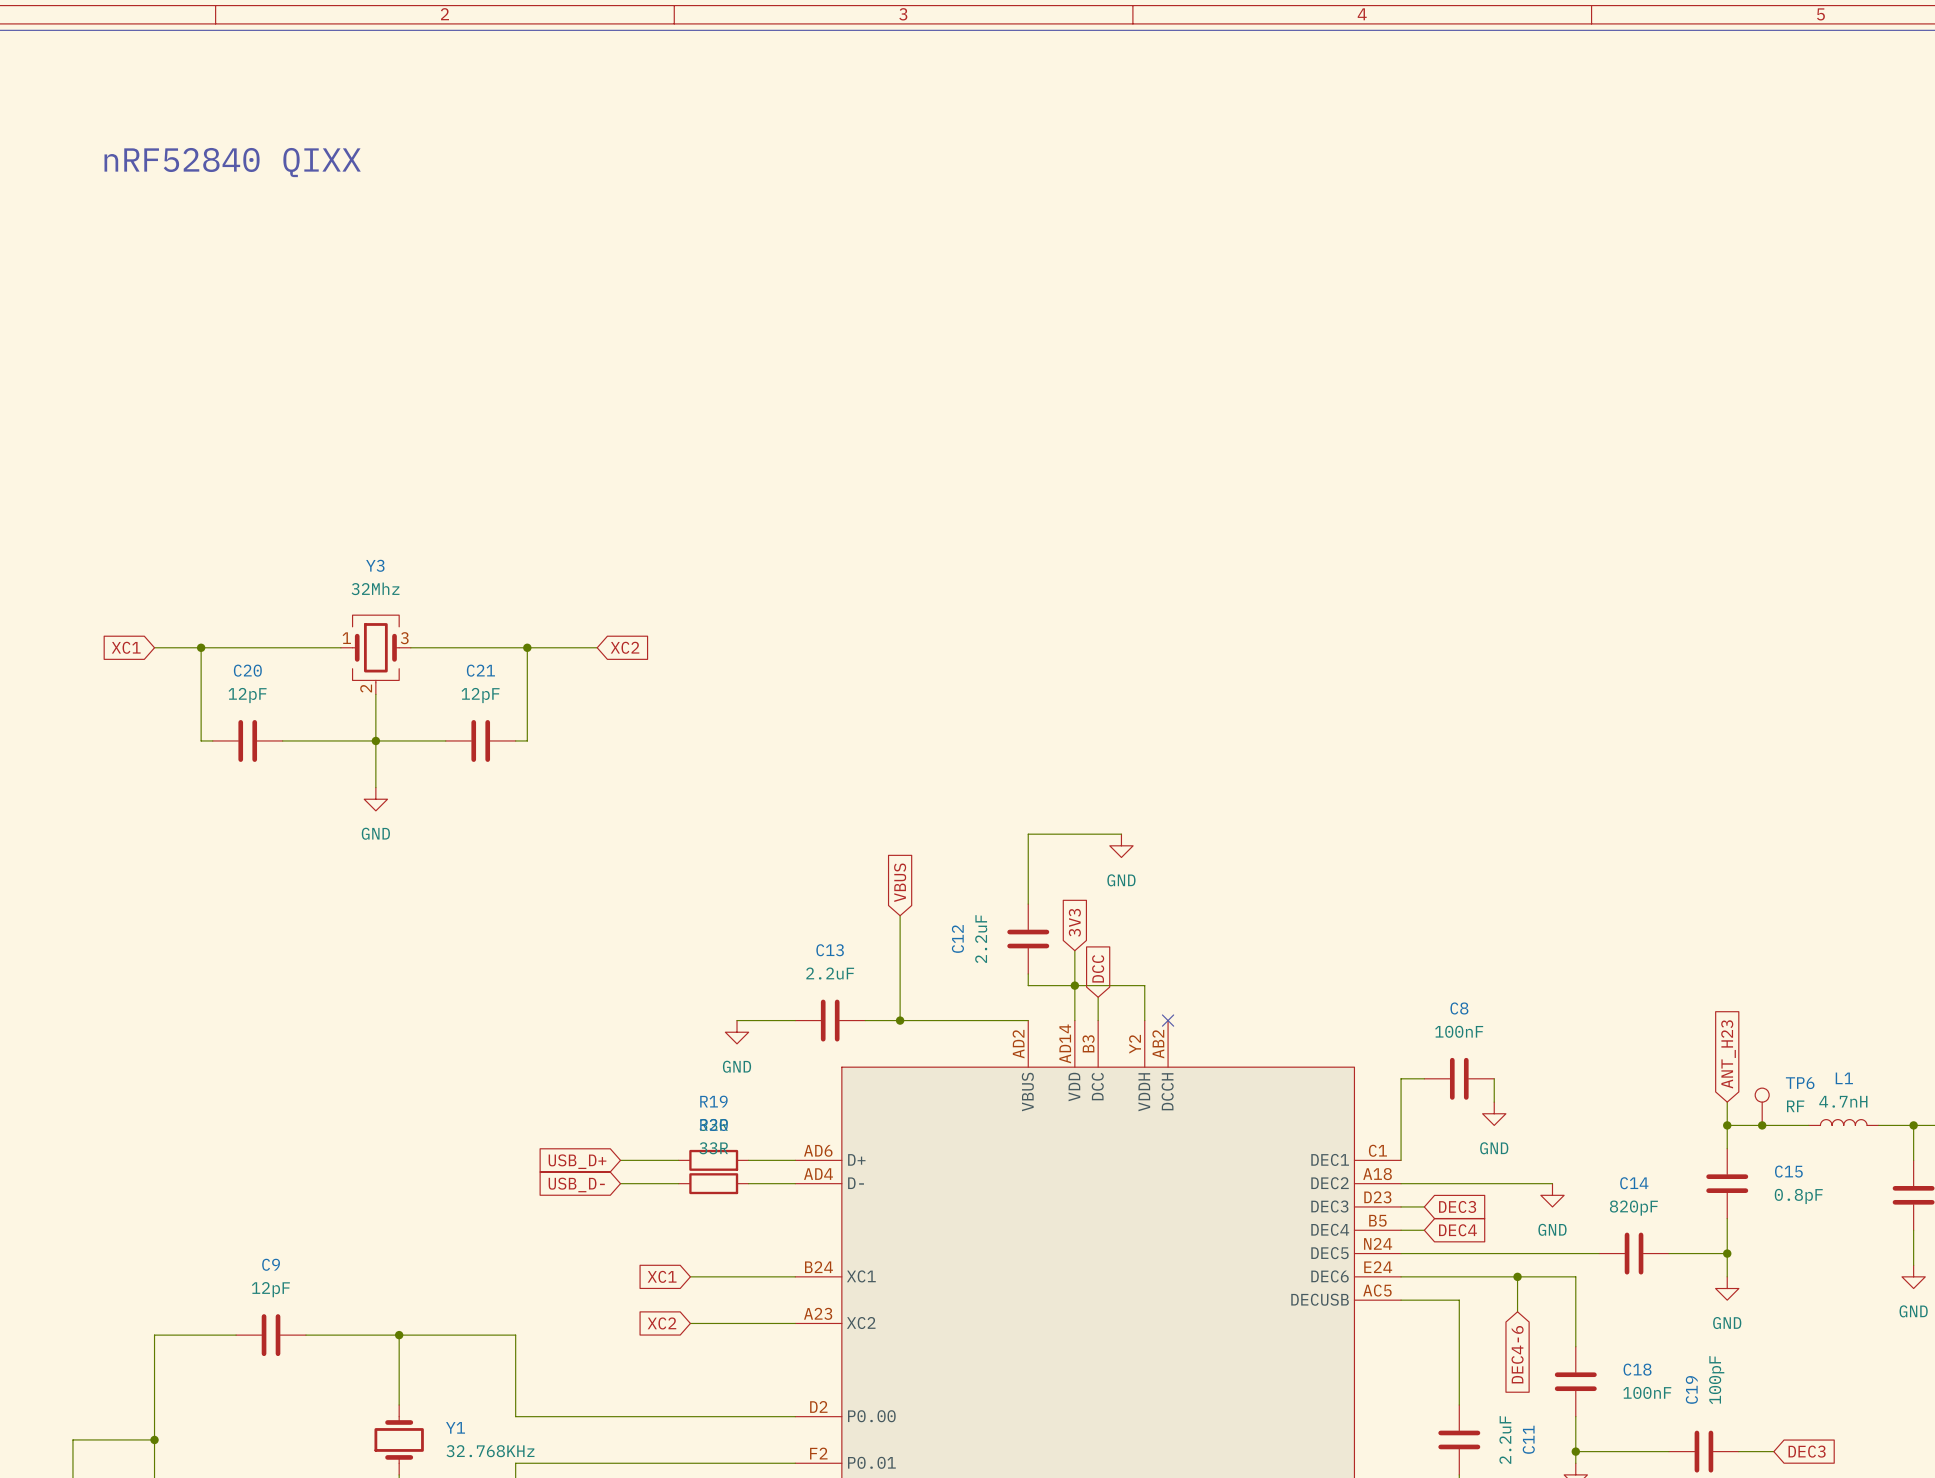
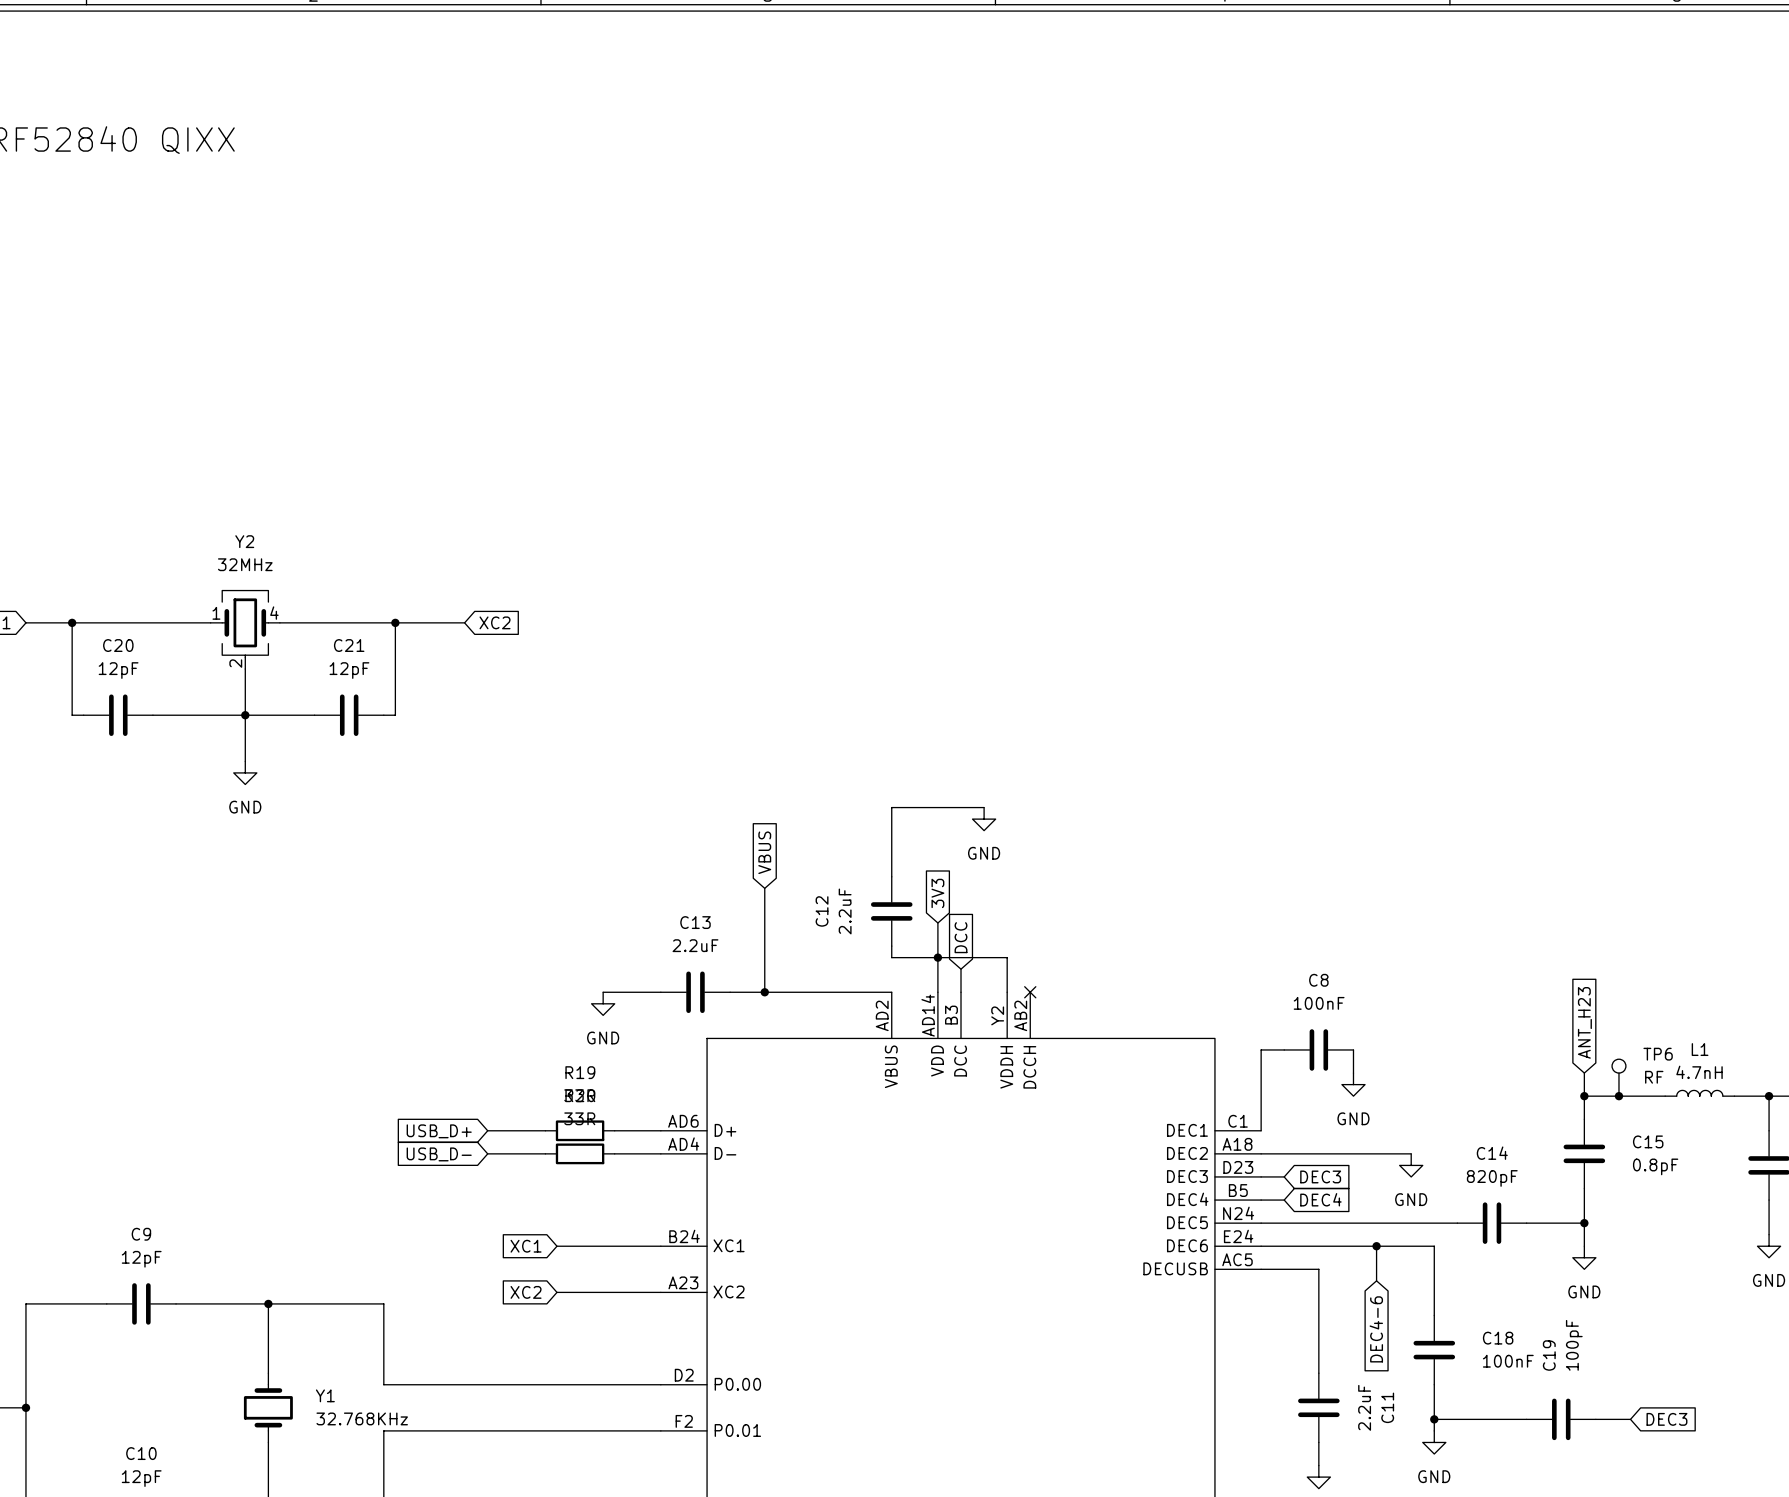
Y3 name: Y3 (375, 565) -> Y2 (244, 541)
Y3 value: 32Mhz (375, 588) -> 32MHz (245, 564)
Y3 pin number: 3 (404, 638) -> 4 (274, 613)

